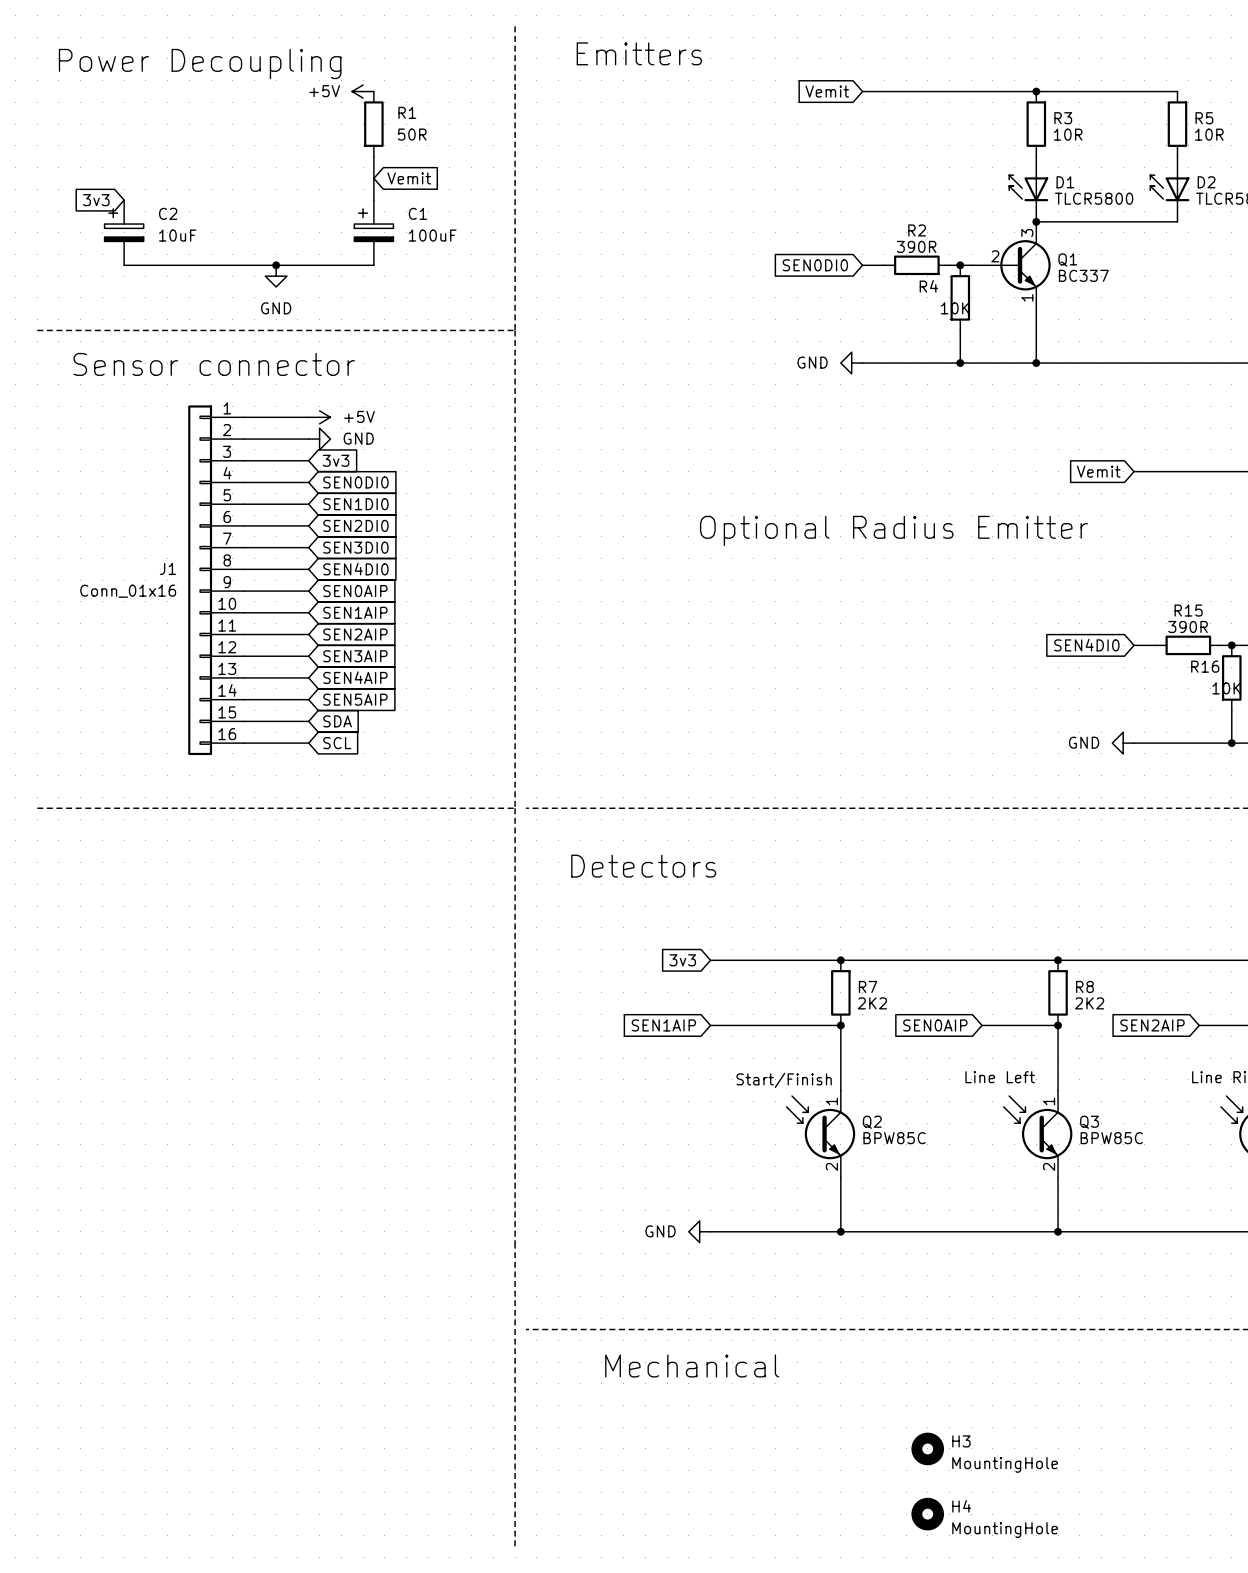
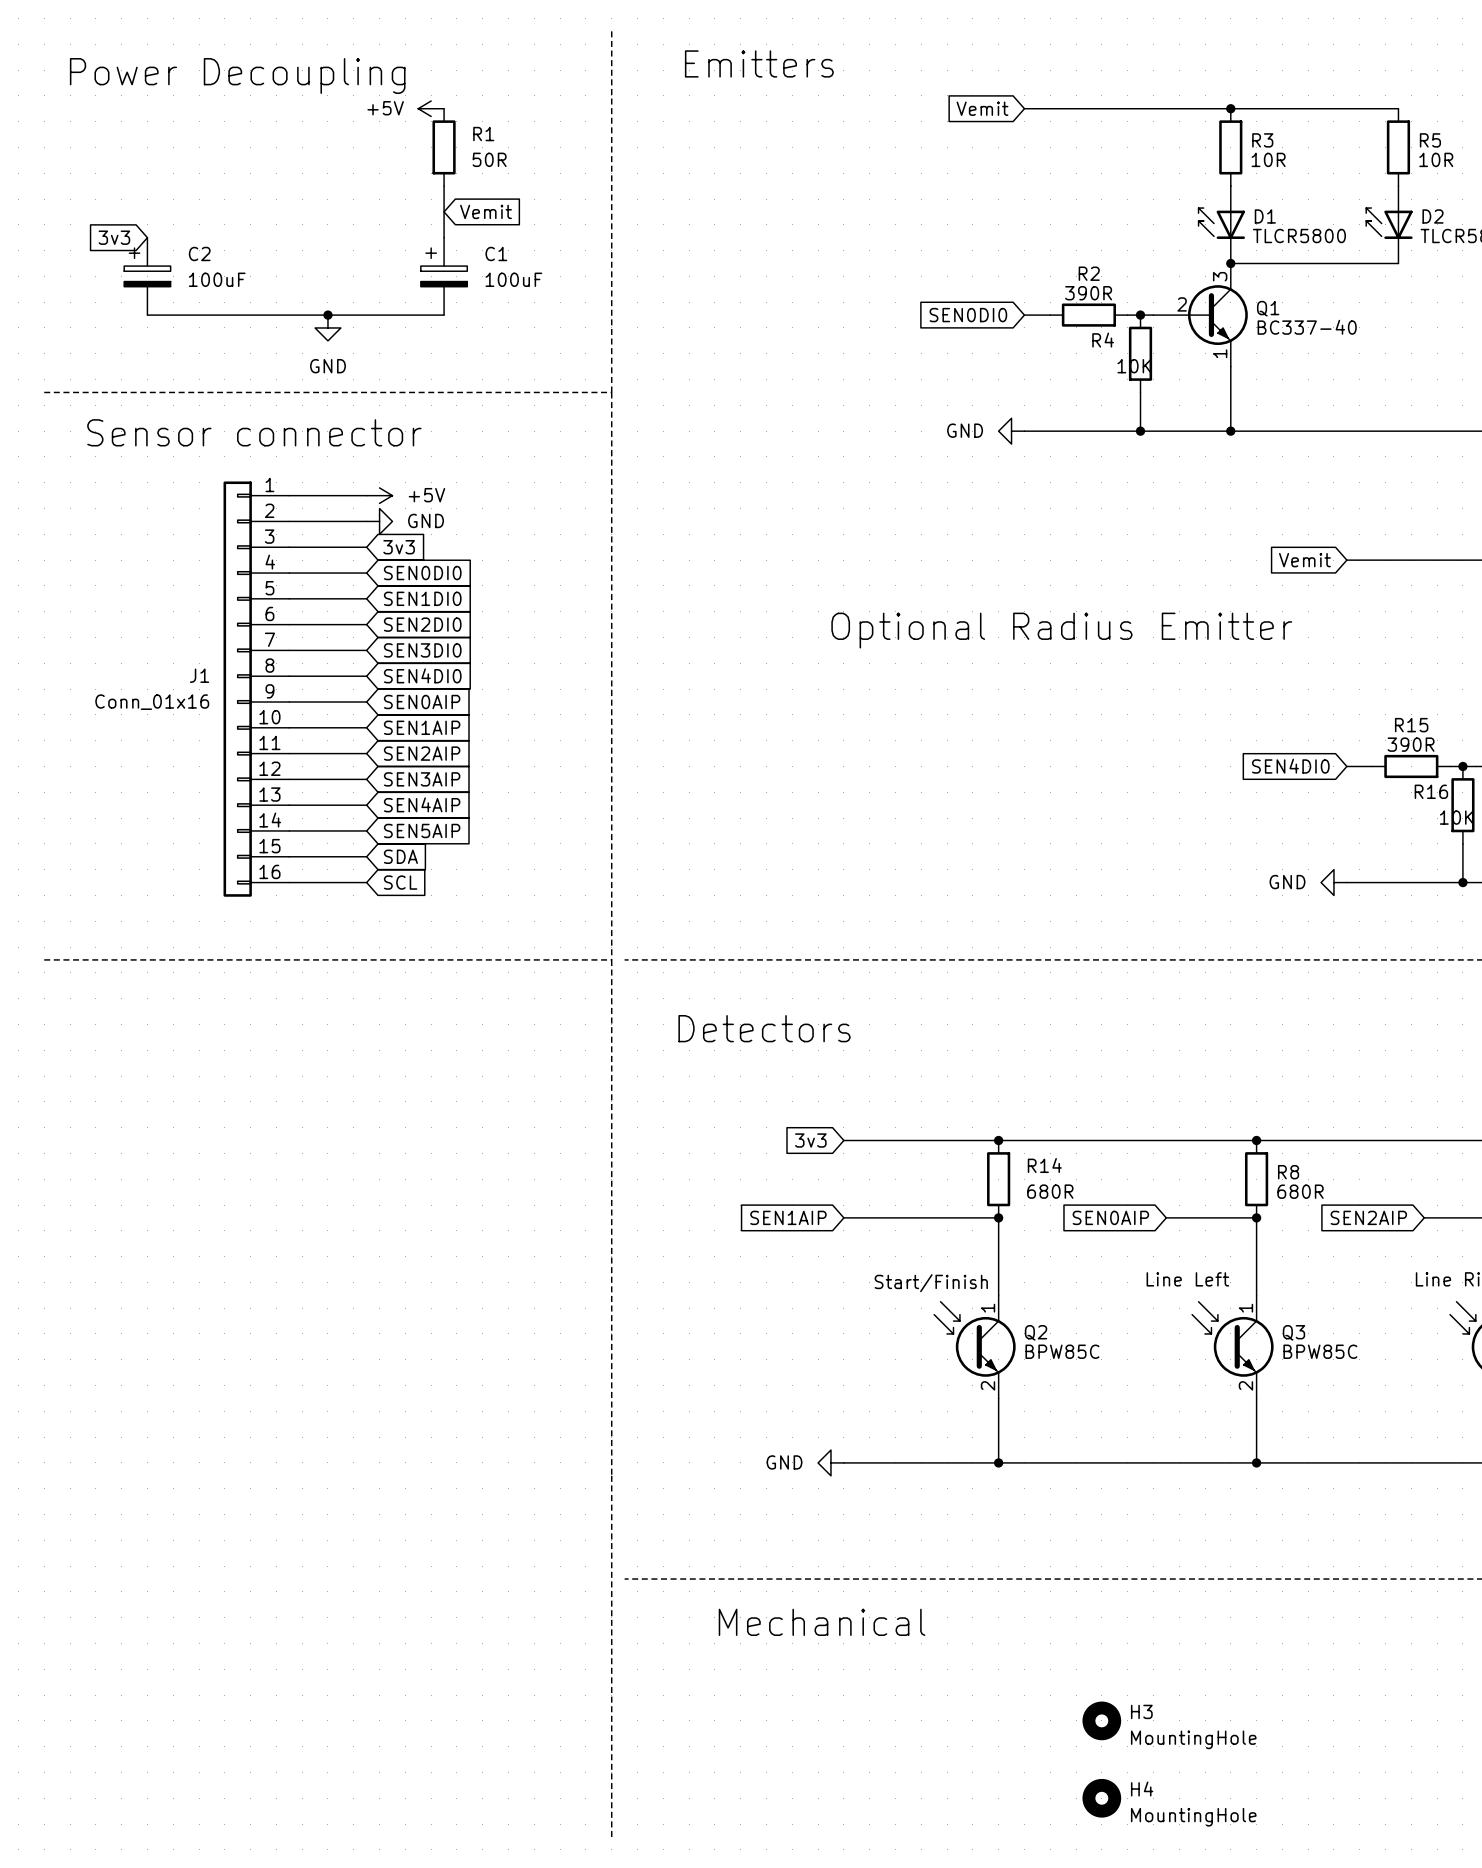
C2 value: 10uF (177, 235) -> 100uF (217, 279)
Q1 value: BC337 (1083, 275) -> BC337-40 (1307, 327)
R7 name: R7 (868, 986) -> R14 (1044, 1165)
R7 value: 2K2 (872, 1003) -> 680R (1050, 1191)
R8 value: 2K2 (1089, 1003) -> 680R (1300, 1191)

